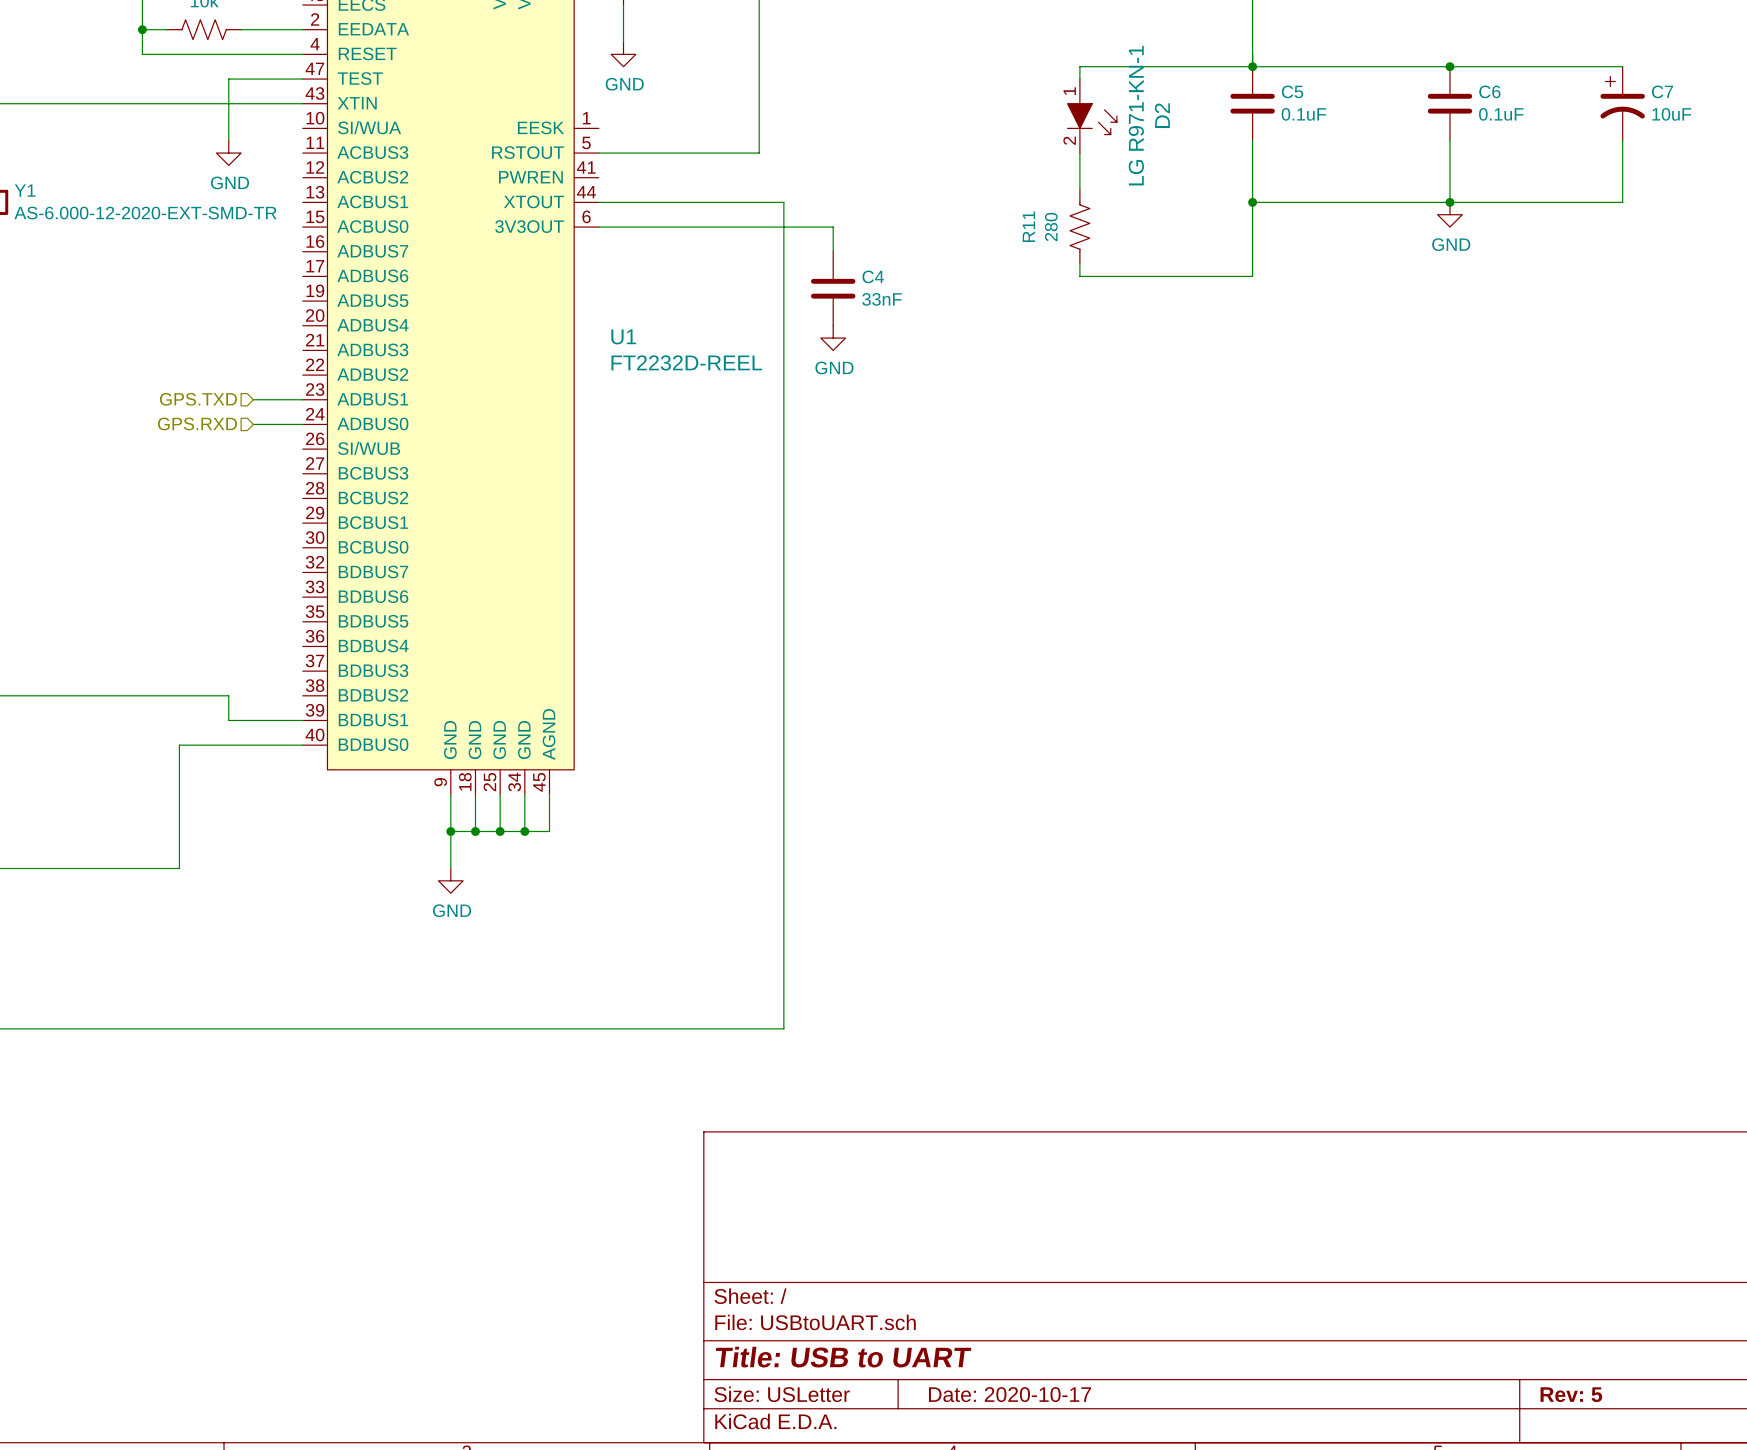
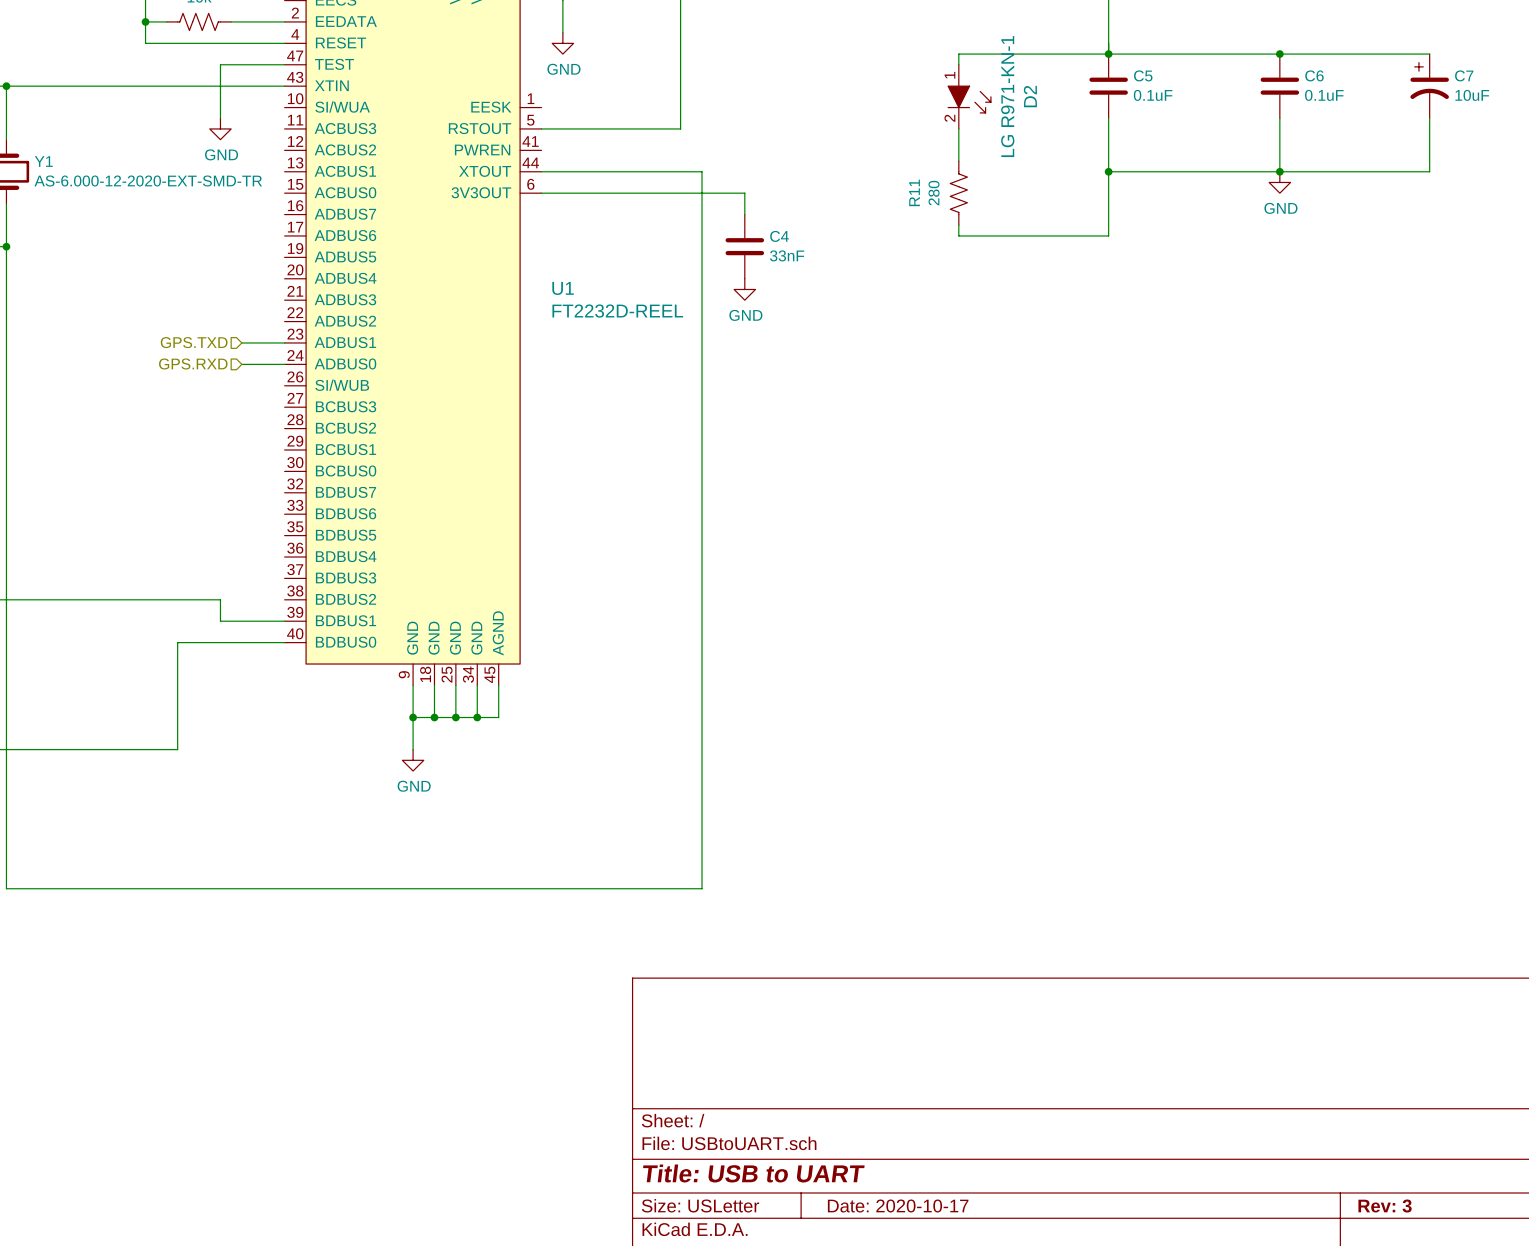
title block: Rev: 5 (1571, 1394) -> Rev: 3 (1385, 1206)

